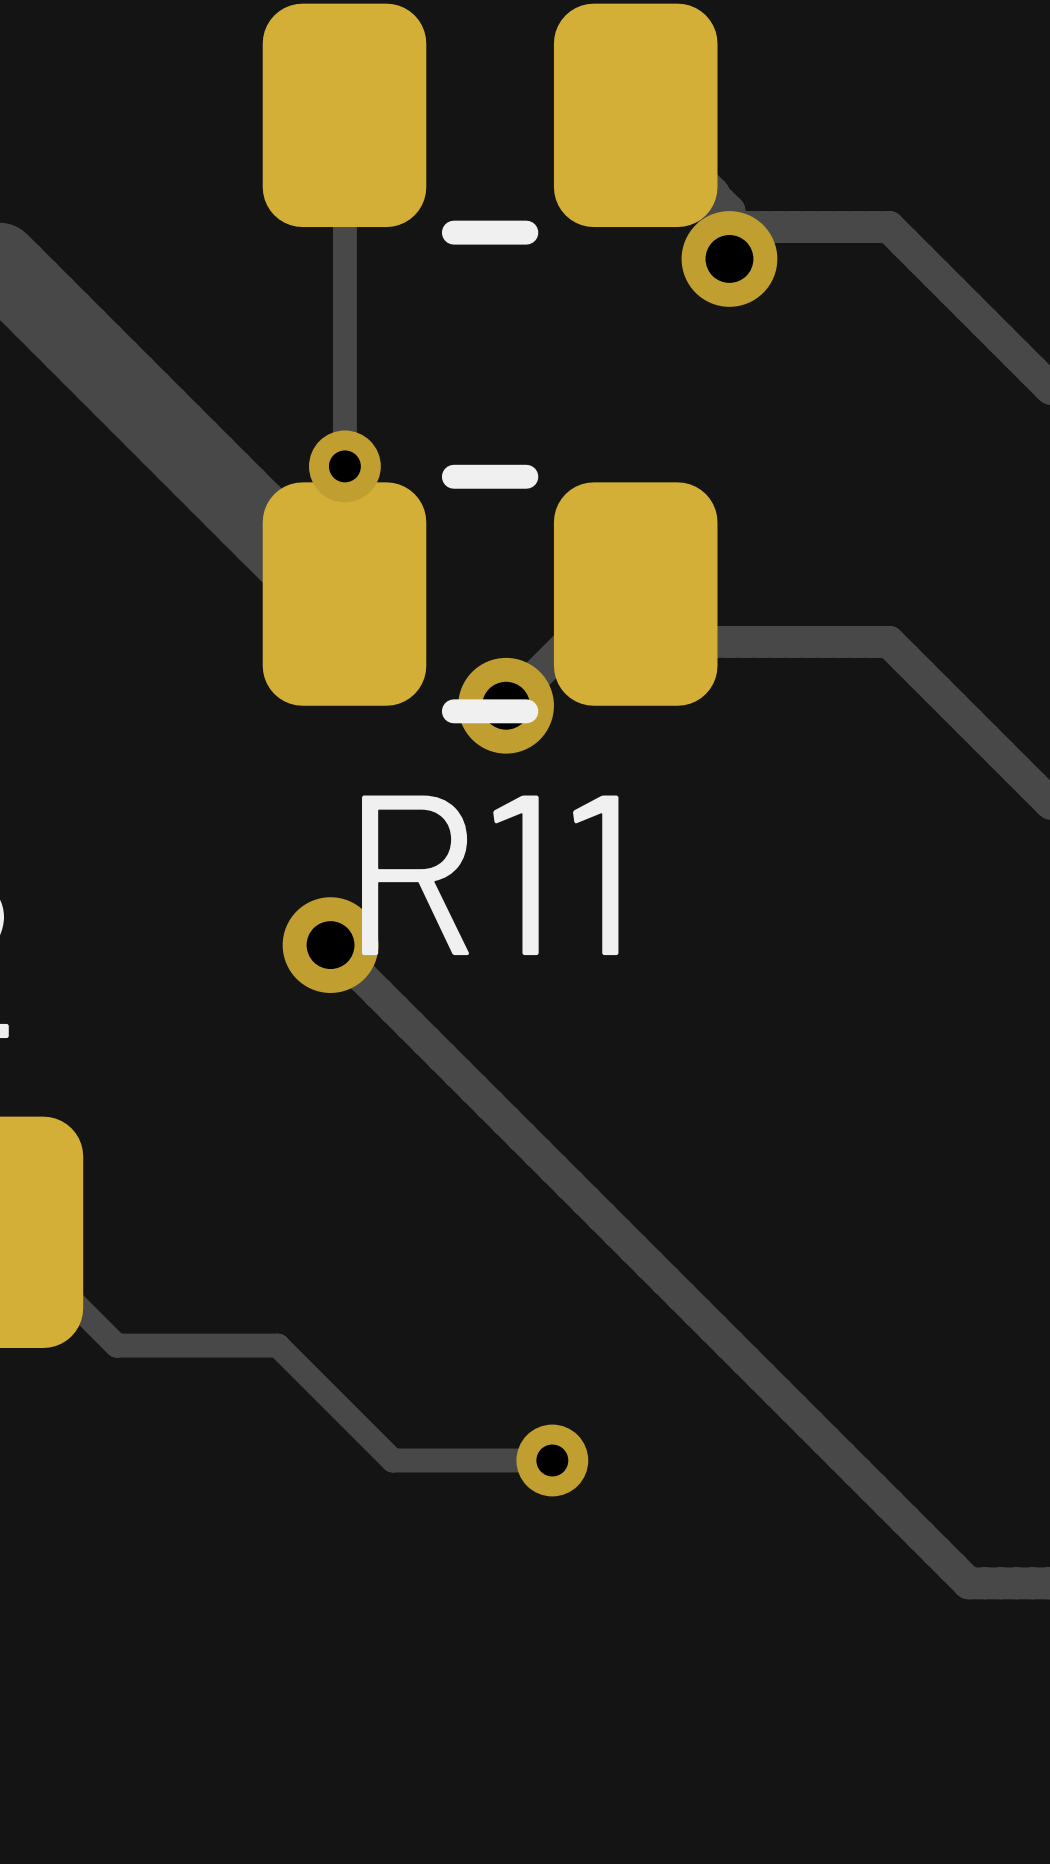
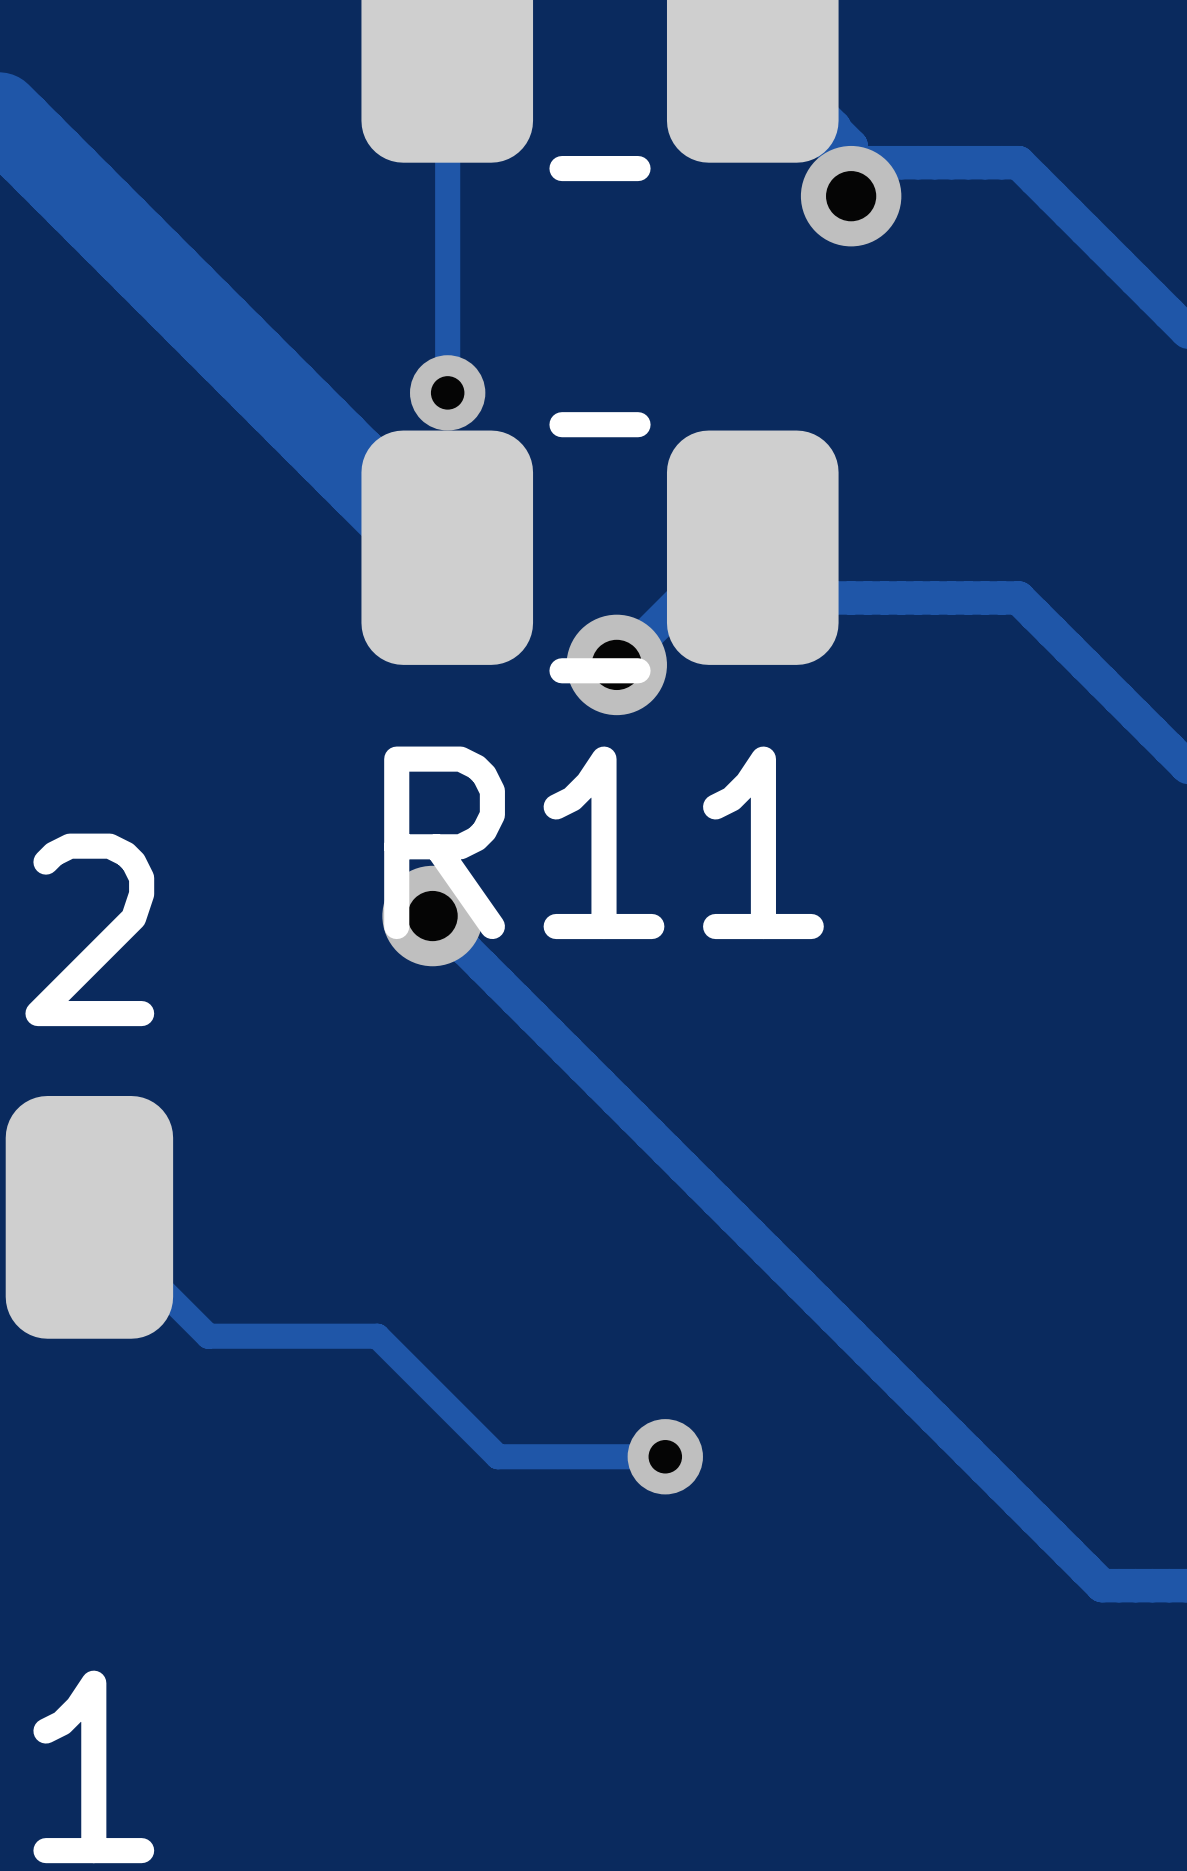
via position: (344, 466) -> (447, 392)

